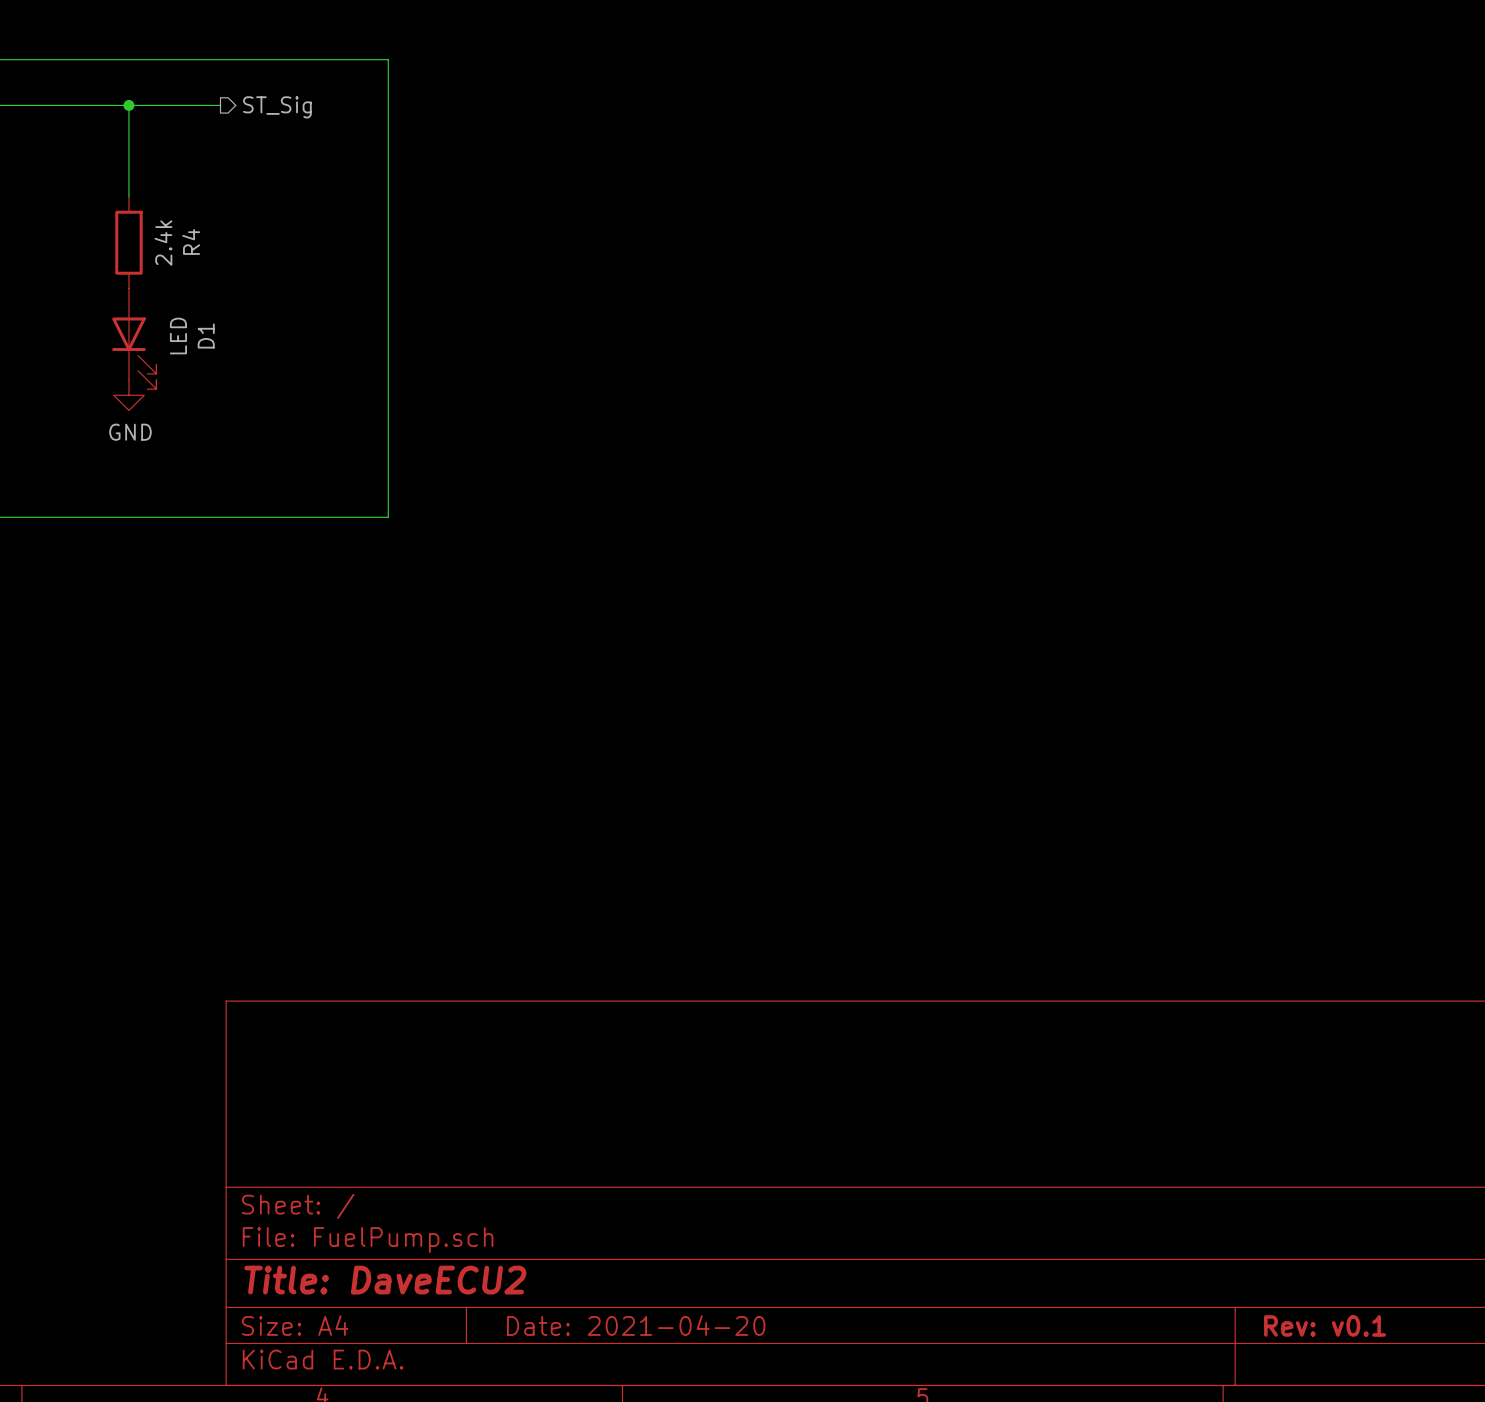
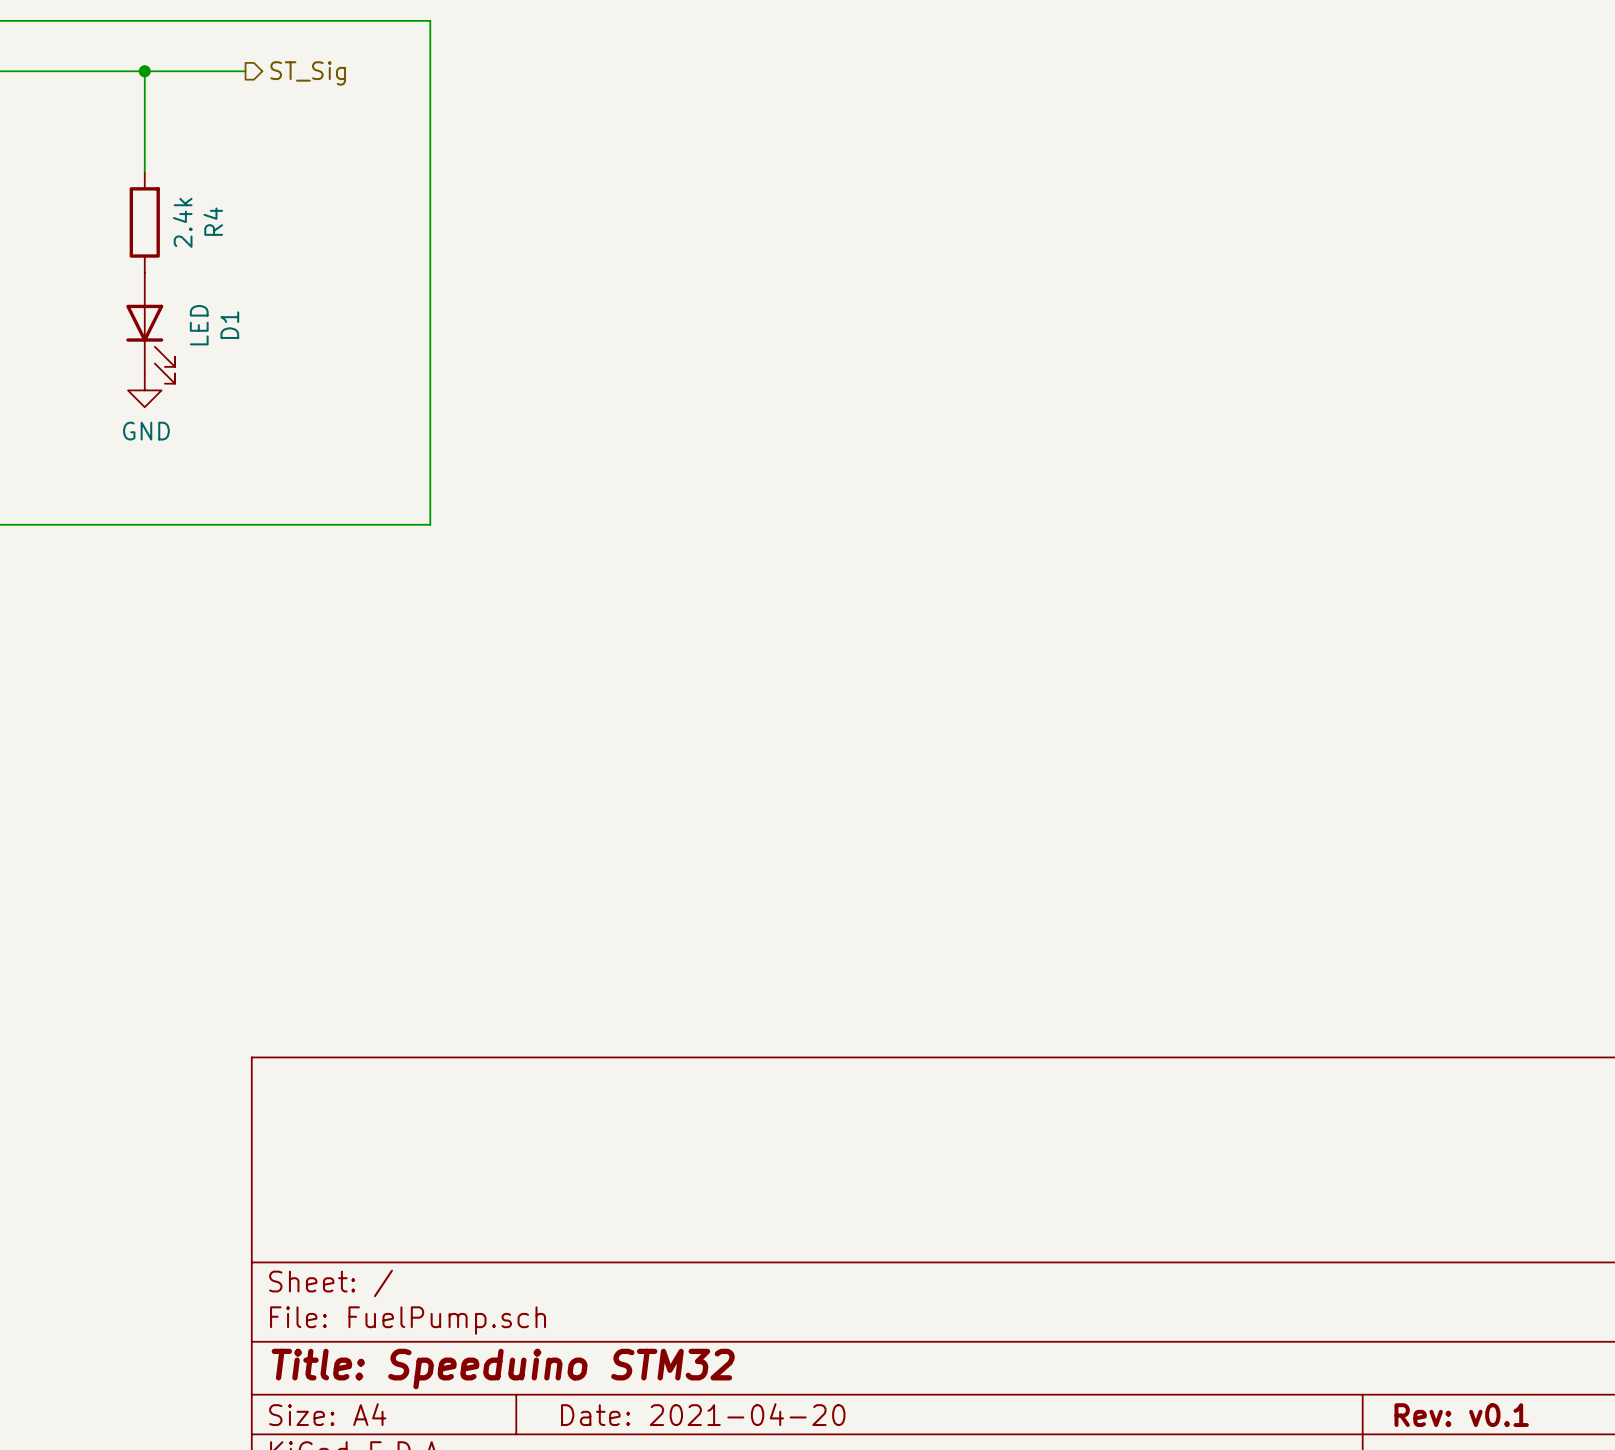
title block: Title: DaveECU2 (385, 1280) -> Title: Speeduino STM32 (503, 1369)

